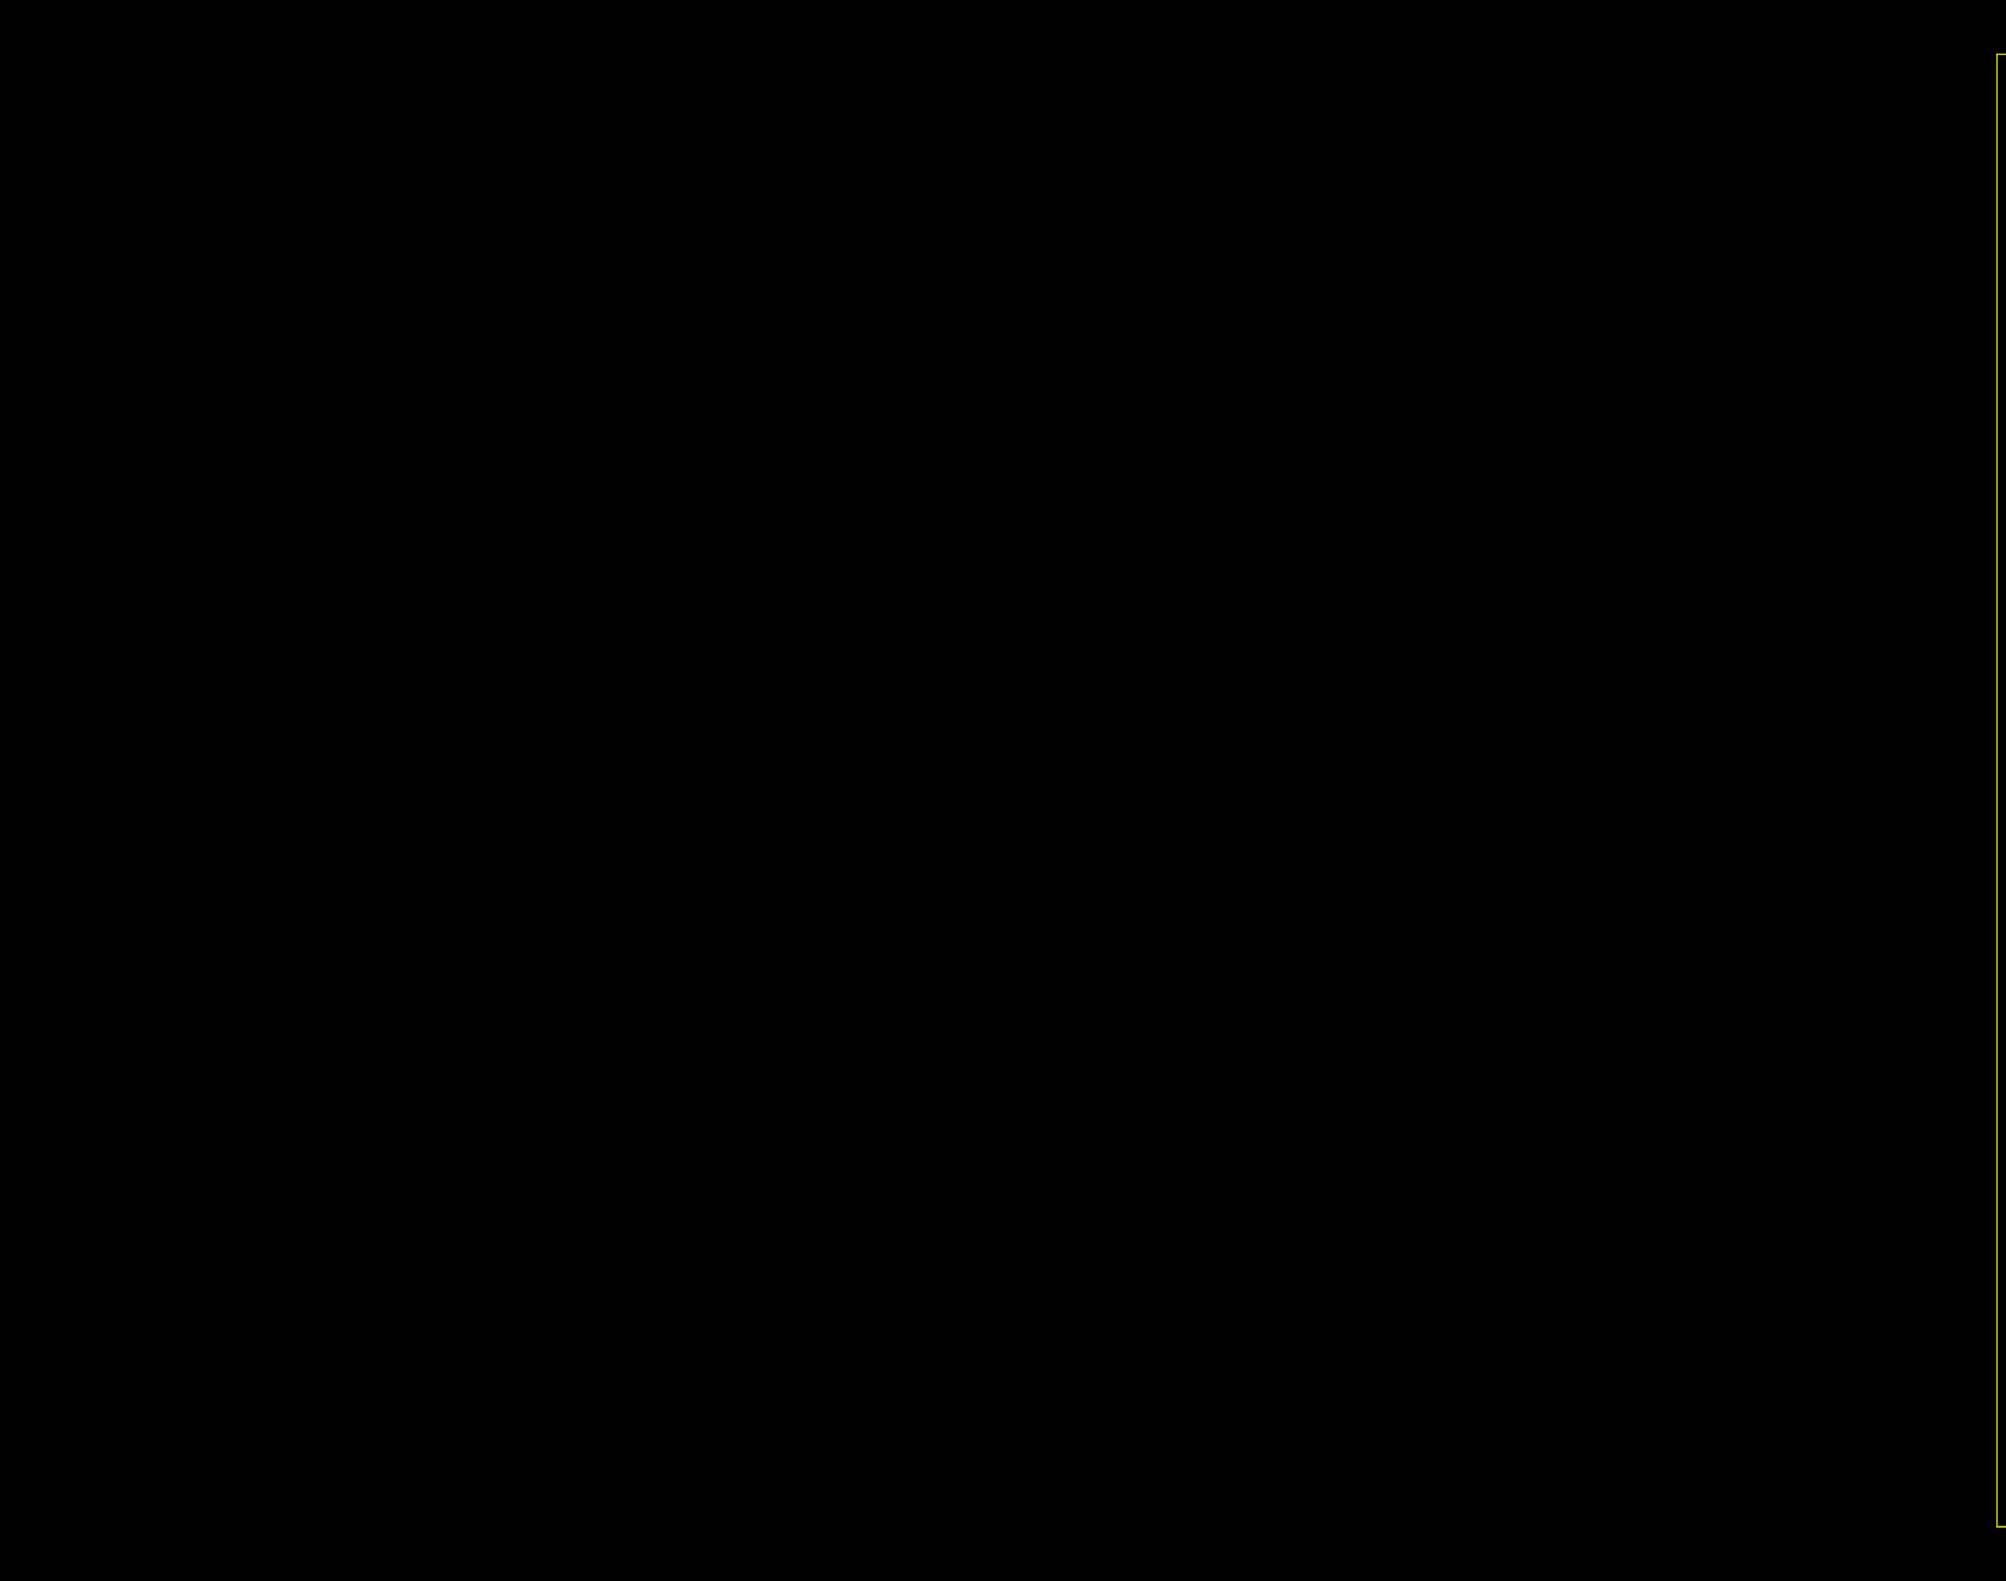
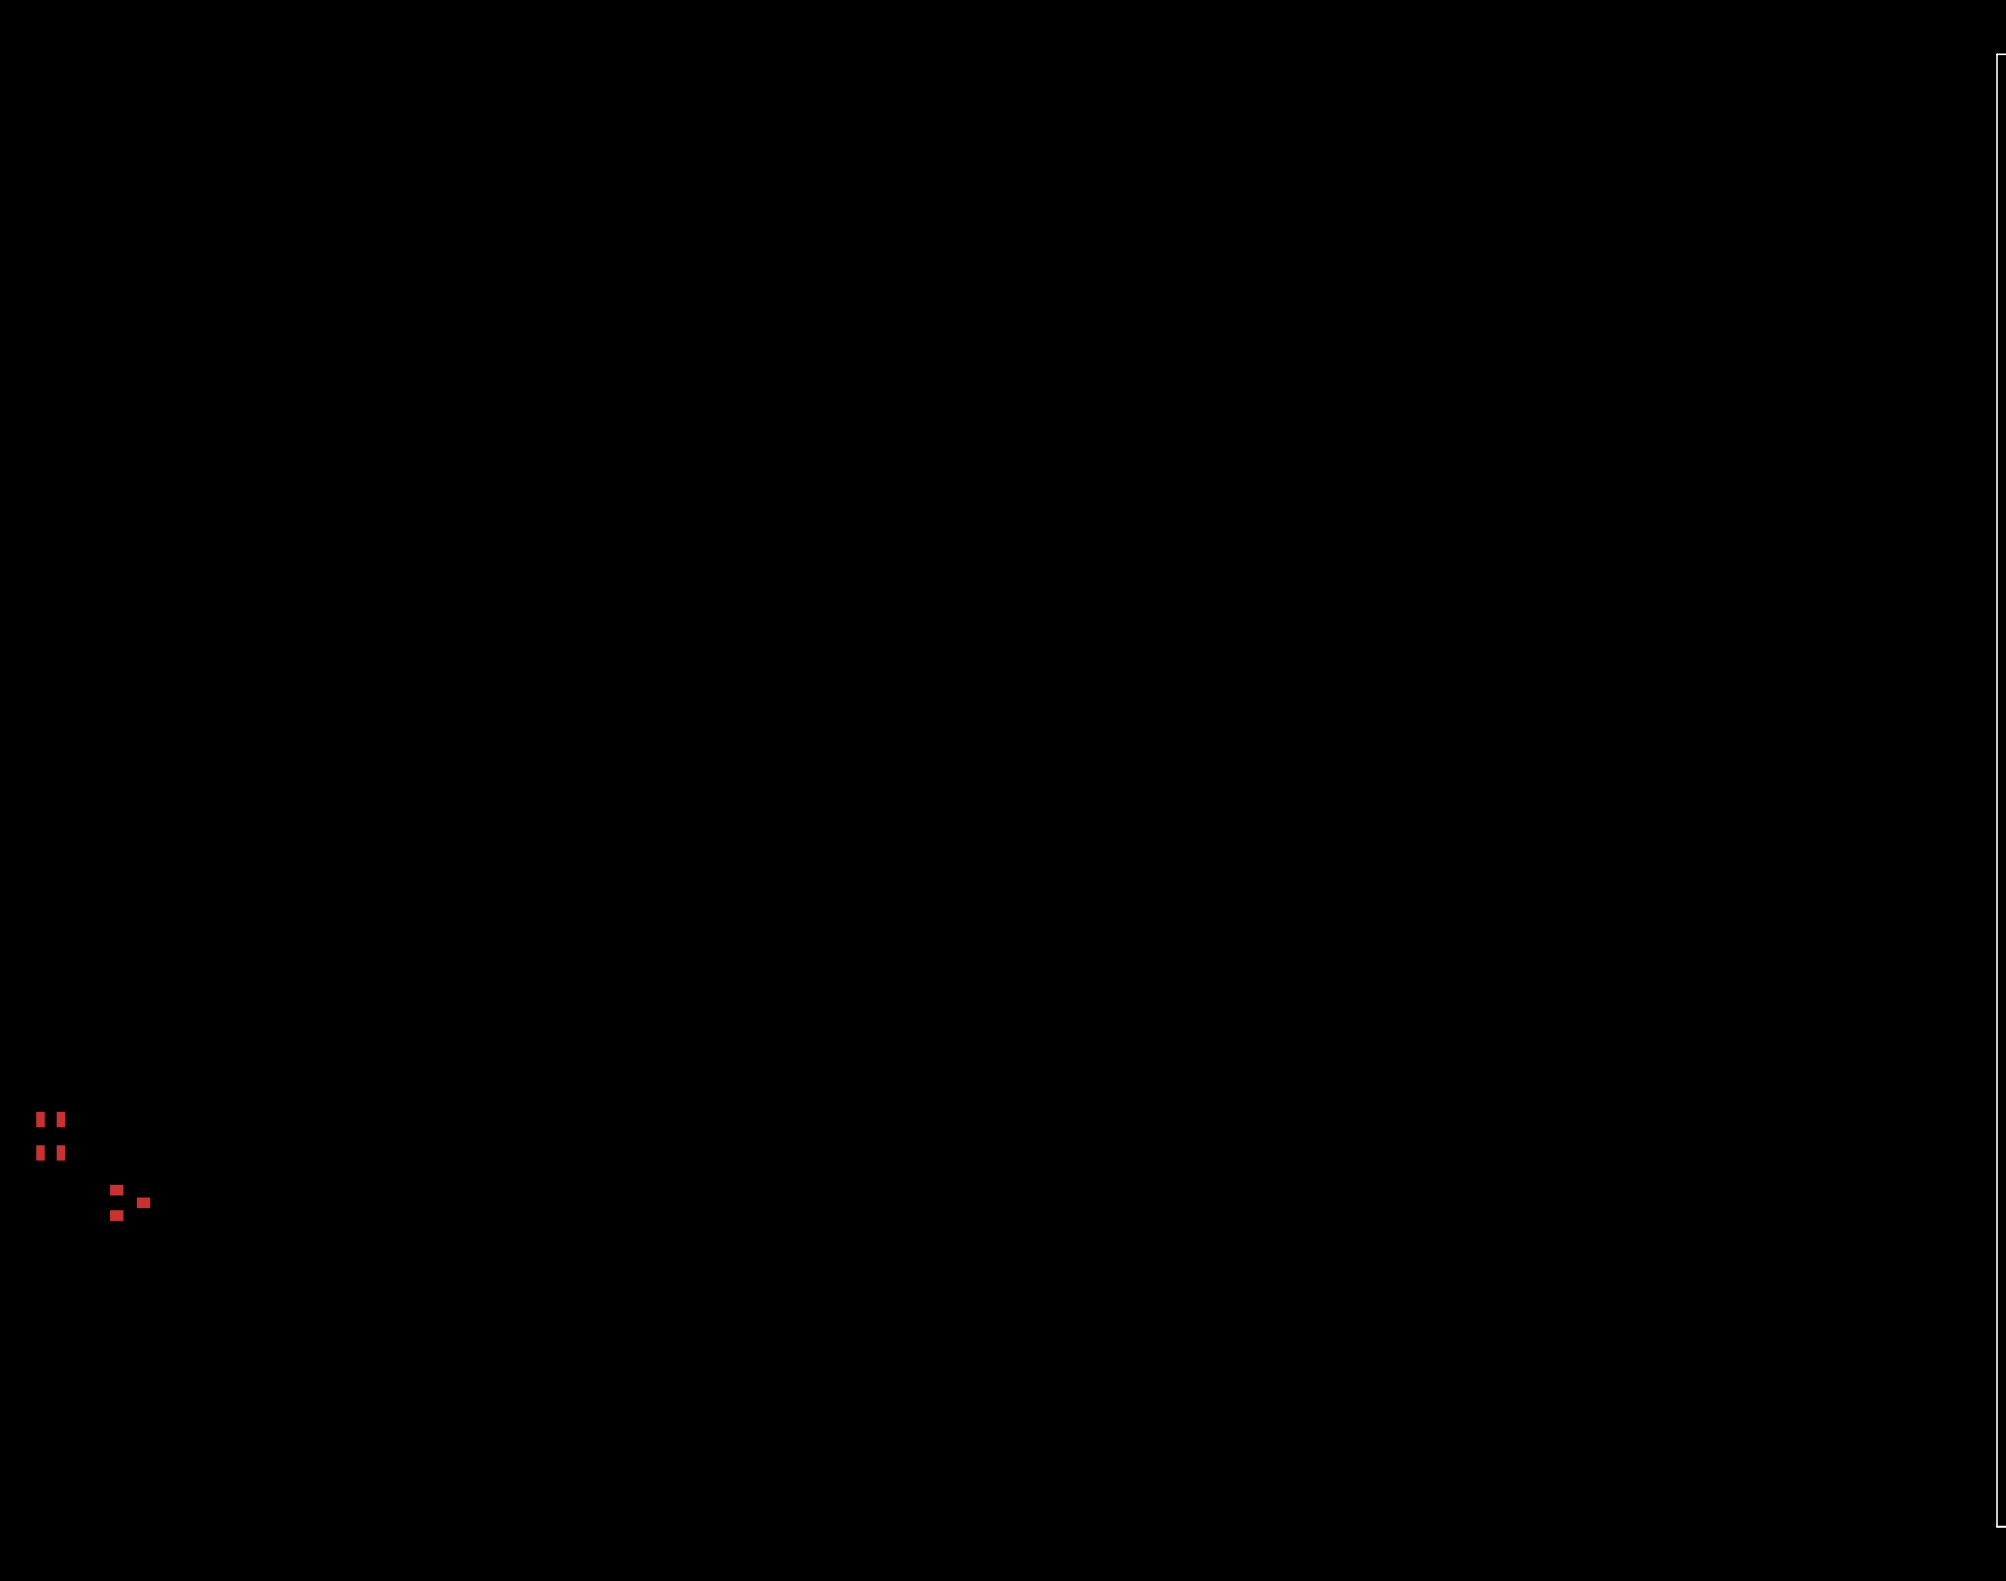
part: none -> (50, 1119)
part: none -> (50, 1152)
part: none -> (130, 1202)

